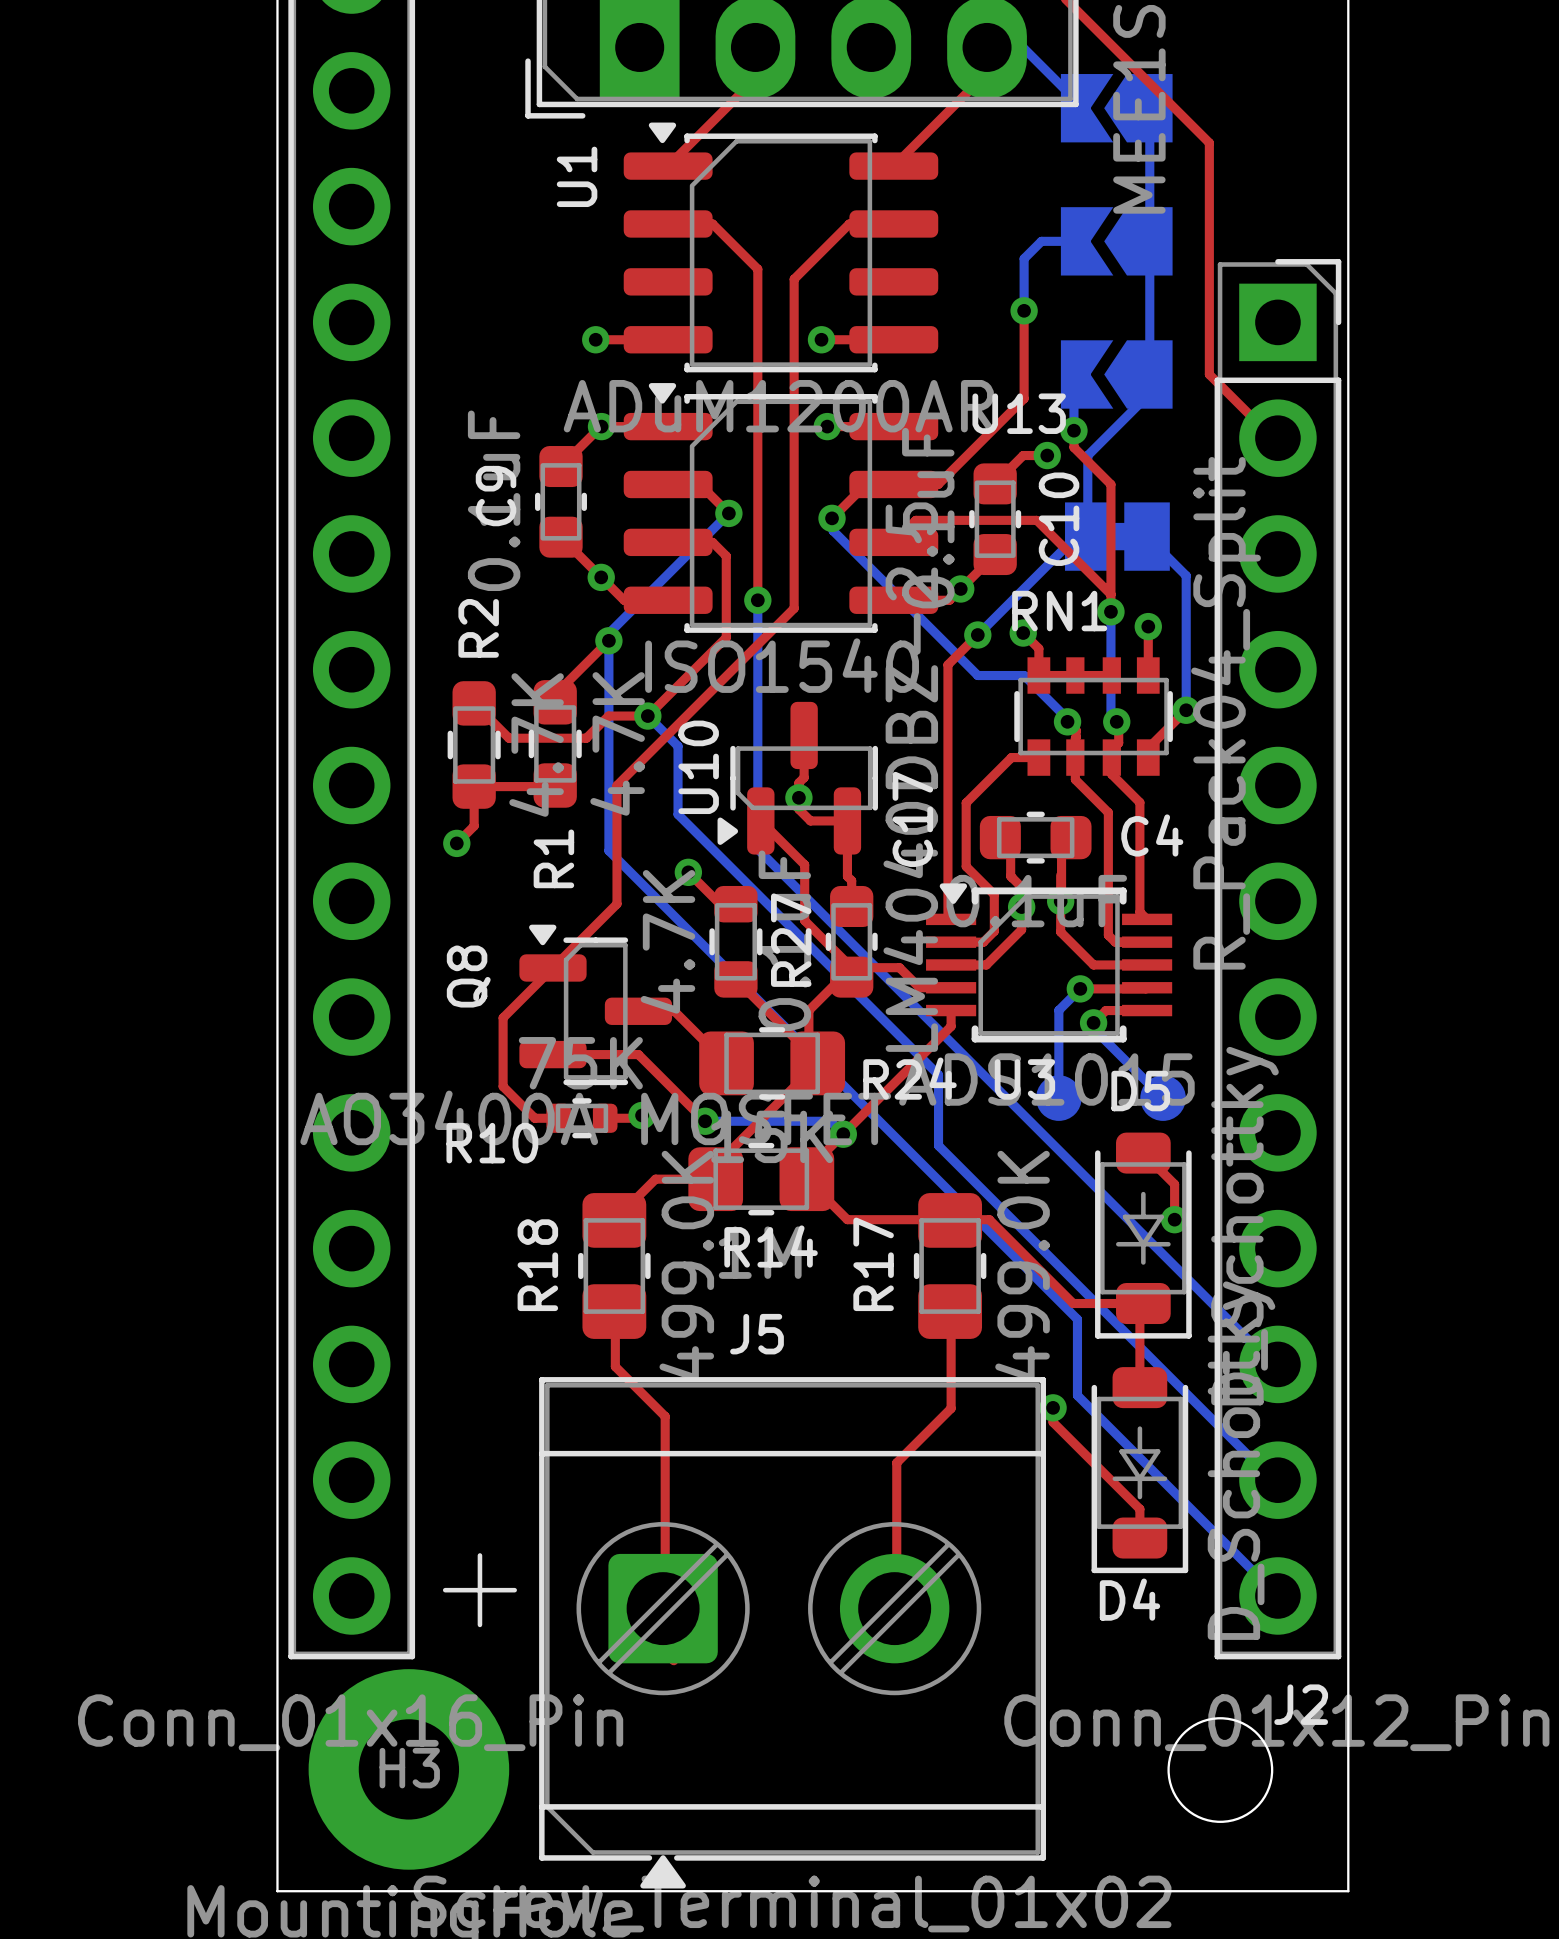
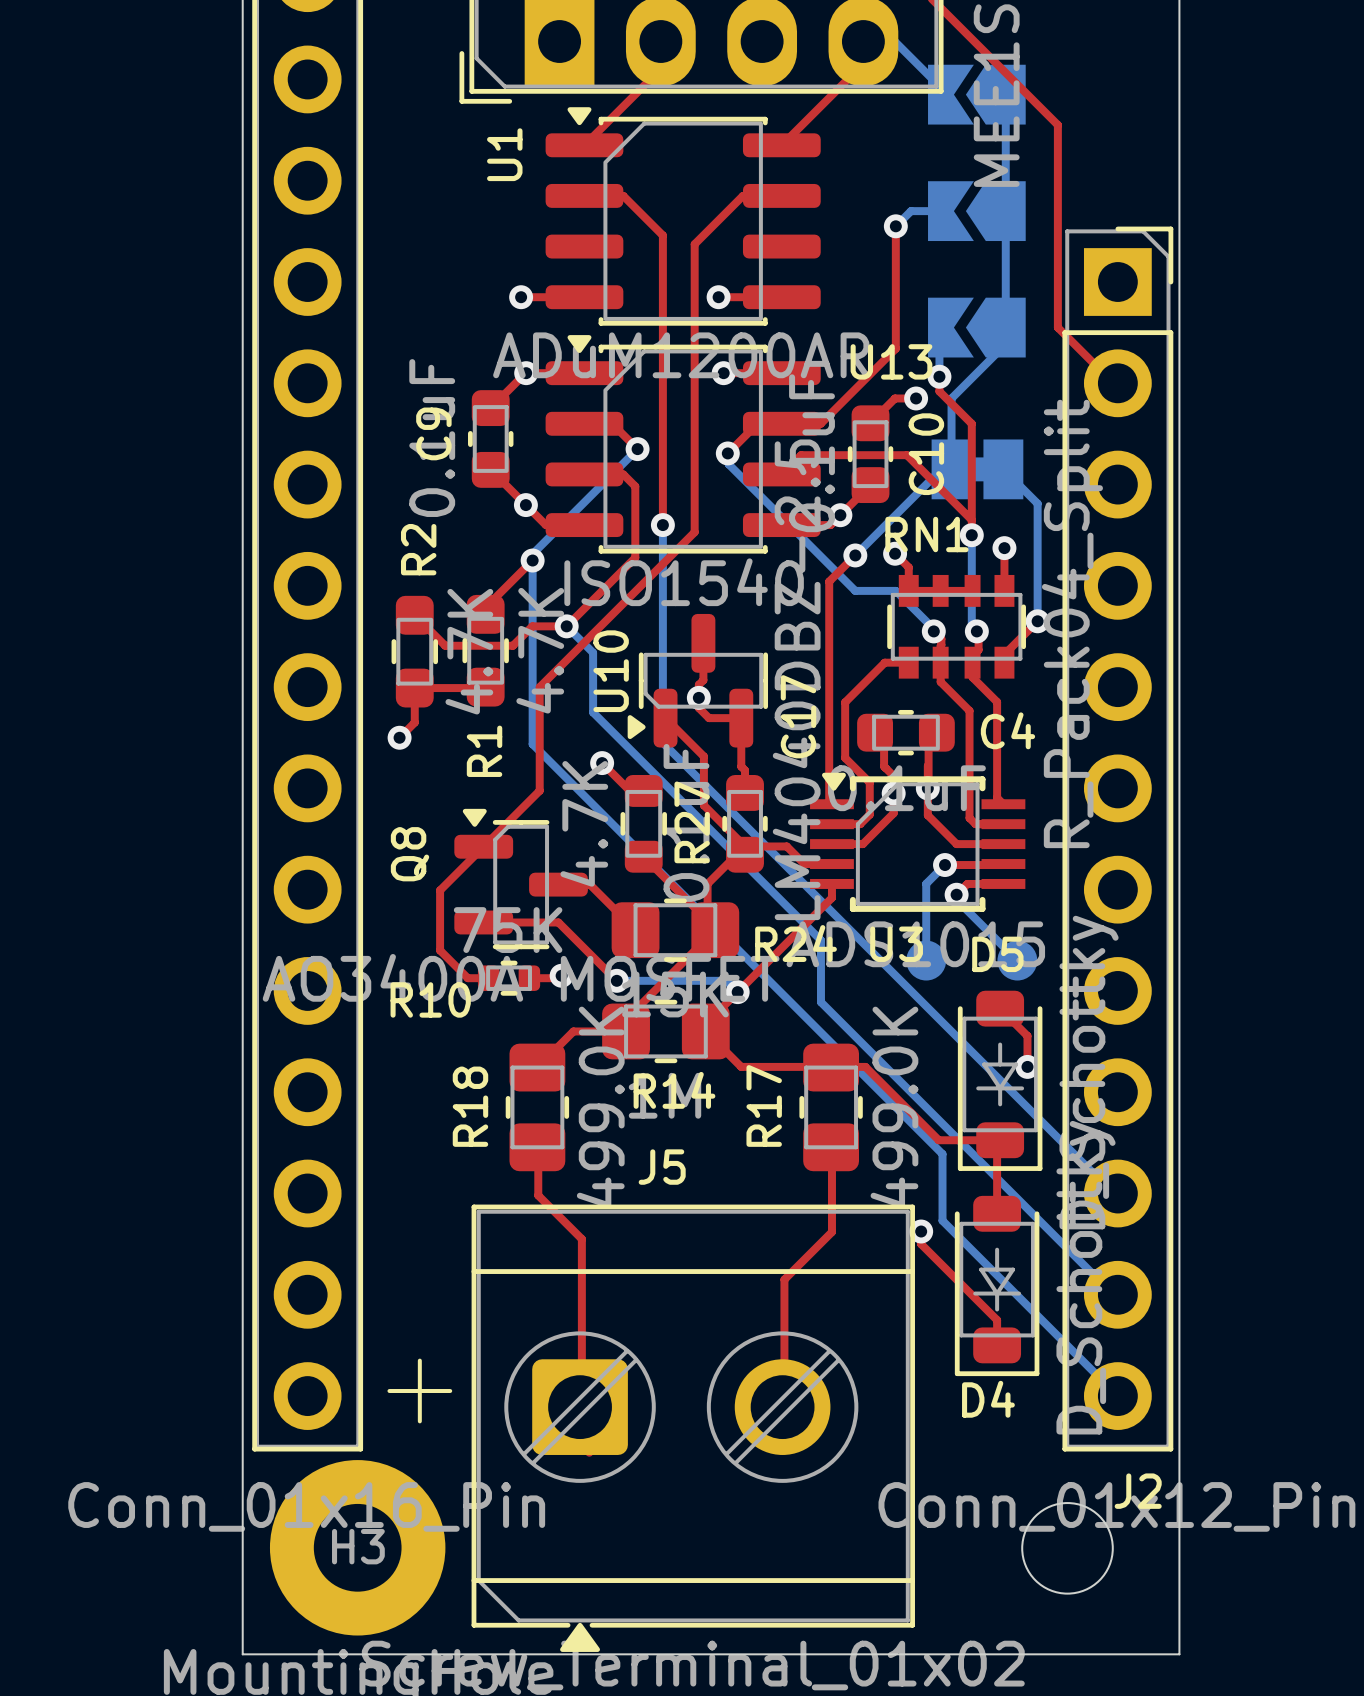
top track: none -> (895, 226) (895, 271)
bottom track: (1024, 258) (1024, 310) -> none
via position: (1024, 310) -> (895, 226)

